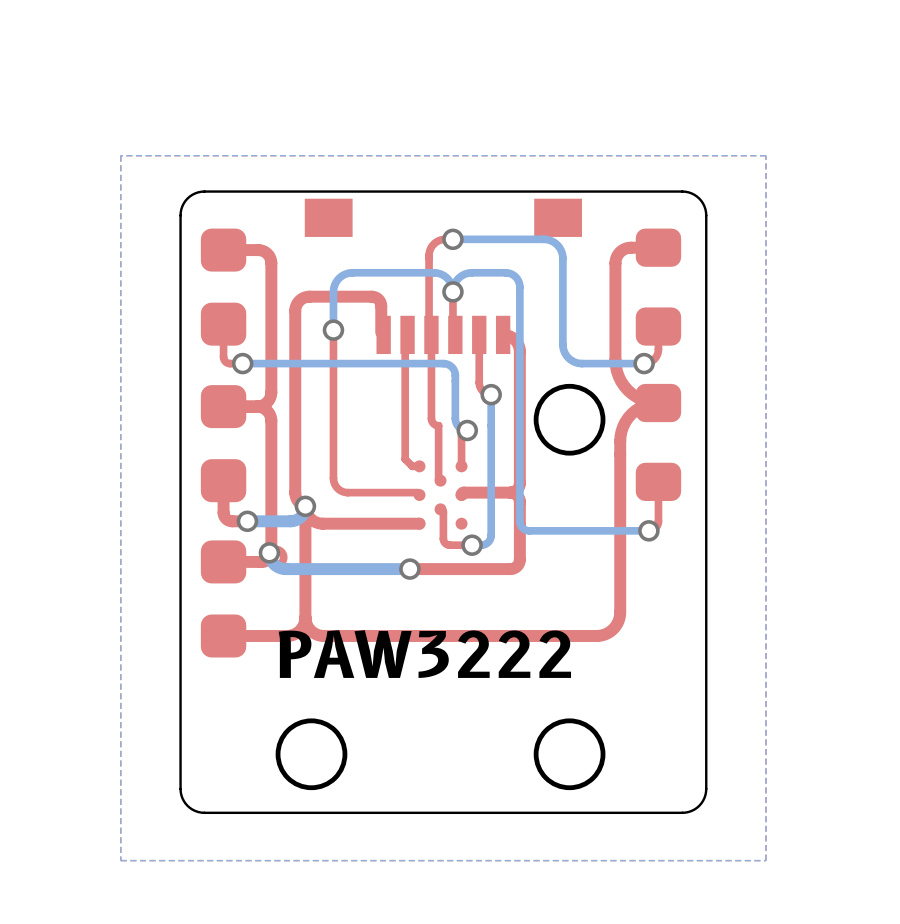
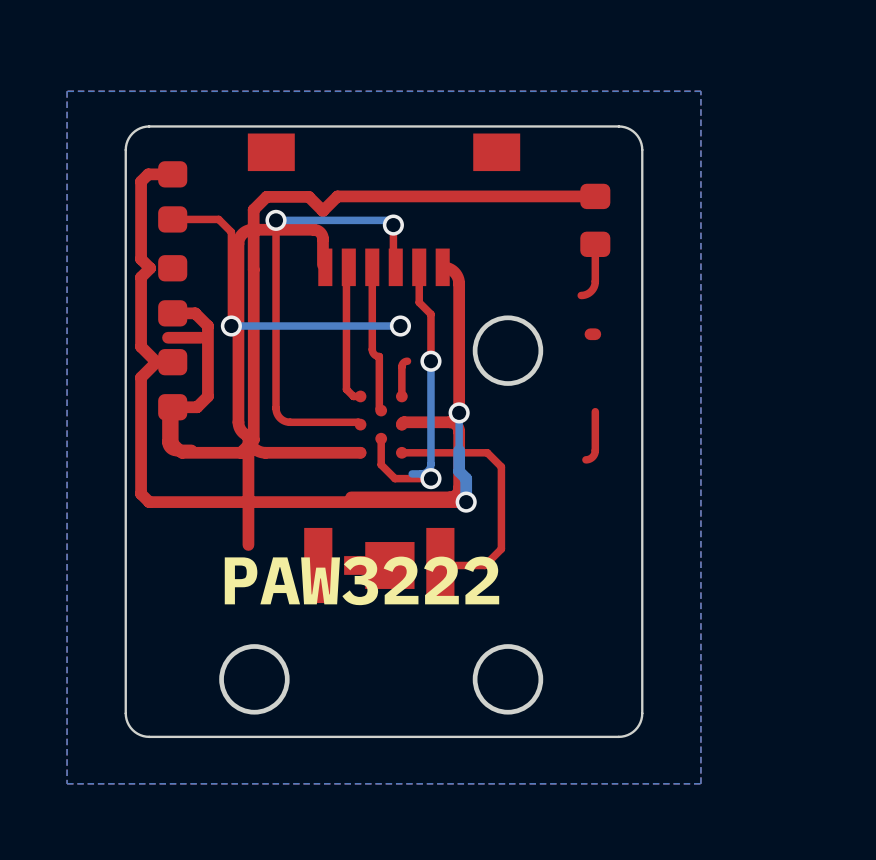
part footprint: [200, 228, 247, 346] -> [158, 161, 188, 233]
part footprint: [635, 228, 682, 346] -> [580, 183, 611, 257]
top track: (452, 239) (437, 241) (429, 251) (429, 332) -> none
bottom track: (452, 239) (543, 239) (553, 242) (559, 248) (562, 256) (562, 344) (567, 356) (579, 363) (644, 363) -> none
via: (452, 239) -> none
top track: none -> (172, 174) (148, 174) (141, 181) (141, 259) (150, 268) (141, 277) (141, 346) (156, 362)
top track: (658, 247) (625, 248) (618, 253) (615, 261) (616, 371) (621, 381) (632, 394) (647, 401) (658, 403) (648, 404) (635, 410) (628, 417) (621, 431) (620, 612) (617, 622) (611, 630) (596, 636) (323, 636) (310, 630) (305, 617) (301, 628) (291, 635) (223, 636) -> none
top track: (223, 250) (261, 250) (267, 253) (271, 261) (271, 394) (265, 403) (257, 406) (267, 410) (271, 419) (271, 550) (279, 550) (283, 557) (281, 562) (275, 565) (268, 560) (268, 559) (268, 558) (268, 556) (269, 552) (268, 558) (267, 559) (267, 559) (265, 560) (263, 561) (223, 561) -> none
top track: none -> (595, 196) (337, 196) (322, 210) (308, 196) (266, 196) (253, 209) (253, 269)
top track: none -> (172, 219) (218, 219) (231, 232) (231, 326)
top track: none -> (276, 220) (276, 262)
via: none -> (276, 220)
bottom track: none -> (393, 220) (276, 220)
top track: (223, 324) (224, 359) (228, 363) (242, 363) -> none
bottom track: (333, 330) (333, 287) (339, 278) (346, 273) (435, 272) (447, 278) (452, 291) (457, 279) (467, 273) (505, 272) (514, 275) (519, 287) (519, 483) -> none
via: (333, 330) -> none
top track: none -> (253, 269) (253, 439) (240, 452) (182, 452) (172, 443) (172, 407) (197, 407) (207, 396) (207, 326) (195, 313) (172, 313)
part: none -> (172, 290)
bottom track: (242, 363) (447, 364) (452, 368) (455, 374) (456, 422) (459, 427) (467, 430) -> none
via: (242, 363) -> none
via: (644, 363) -> none
top track: (479, 370) (480, 387) (484, 392) (491, 394) -> (419, 302) (430, 314) (430, 361)
part footprint: [200, 385, 247, 503] -> [158, 349, 188, 421]
via: none -> (231, 326)
bottom track: none -> (400, 326) (231, 326)
via: none -> (400, 326)
bottom track: (491, 394) (491, 430) -> none
via: (491, 394) -> none
via: (467, 430) -> none
via: none -> (430, 361)
top track: none -> (156, 362) (141, 377) (141, 493) (149, 502) (466, 502)
part: (658, 442) -> none
via: none -> (459, 412)
bottom track: (305, 506) (302, 515) (293, 520) (247, 521) -> none
via: (305, 506) -> none
top track: (440, 509) (443, 511) (443, 538) (445, 543) (448, 545) (472, 545) -> (381, 438) (381, 464) (395, 478) (430, 478) (426, 473)
via: (247, 521) -> none
bottom track: (519, 521) (521, 527) (528, 530) (648, 530) -> (459, 450) (459, 471) (466, 478) (466, 502)
top track: none -> (401, 452) (487, 452) (501, 466) (501, 549) (484, 565) (440, 565)
via: (648, 530) -> none
via position: (472, 545) -> (430, 478)
bottom track: (269, 552) (272, 562) (283, 568) (409, 569) -> none
via: (269, 552) -> none
via: (409, 569) -> none
via: none -> (466, 502)
part: (223, 598) -> none
part: none -> (379, 565)

